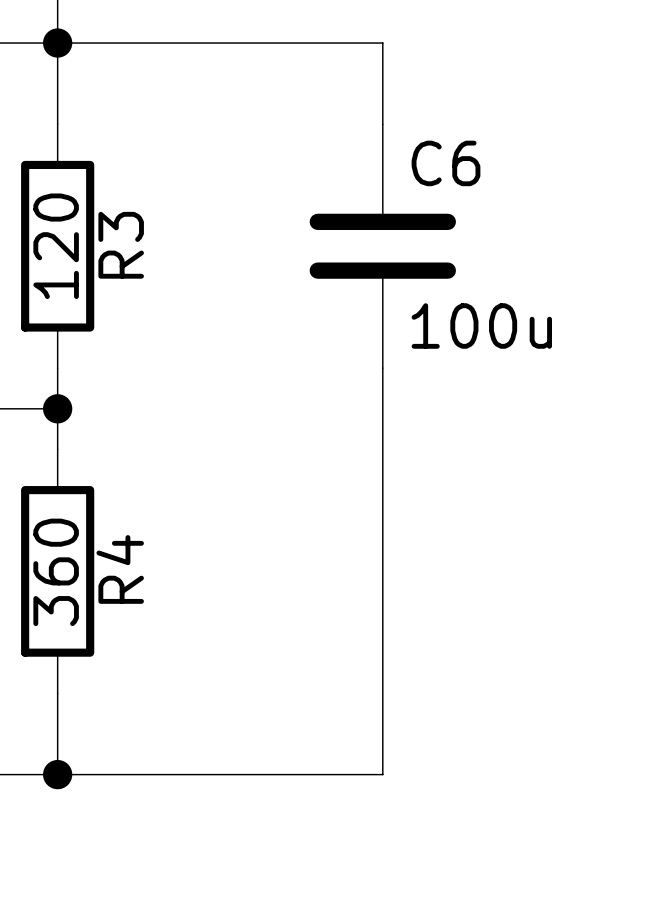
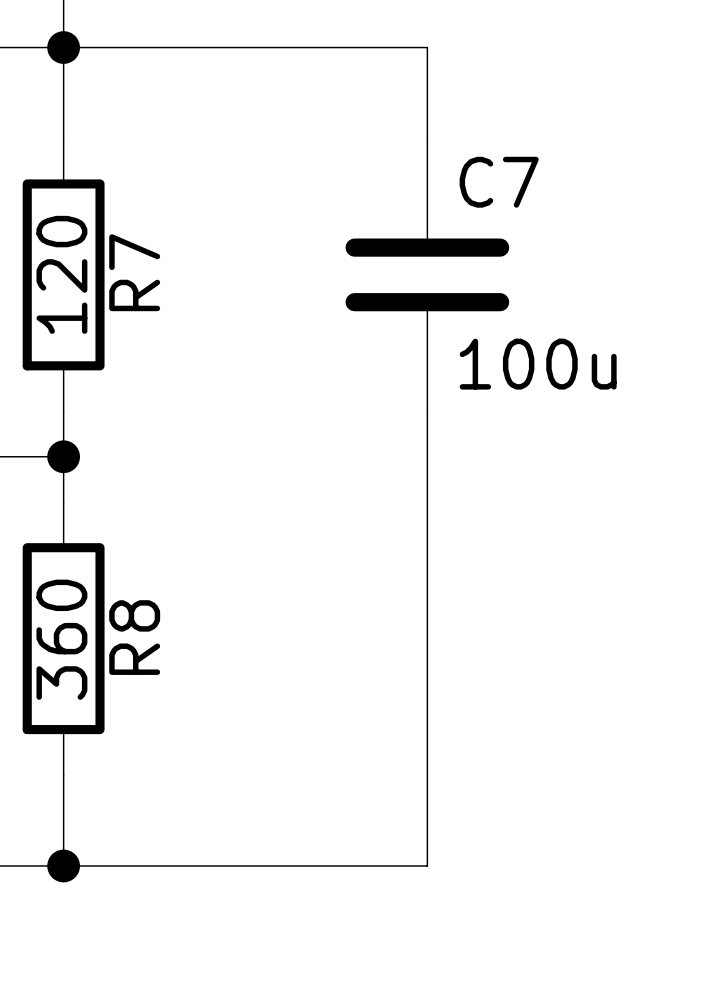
C6 name: C6 (446, 163) -> C7 (499, 182)
R3 name: R3 (121, 245) -> R7 (134, 272)
R4 name: R4 (120, 569) -> R8 (134, 637)

